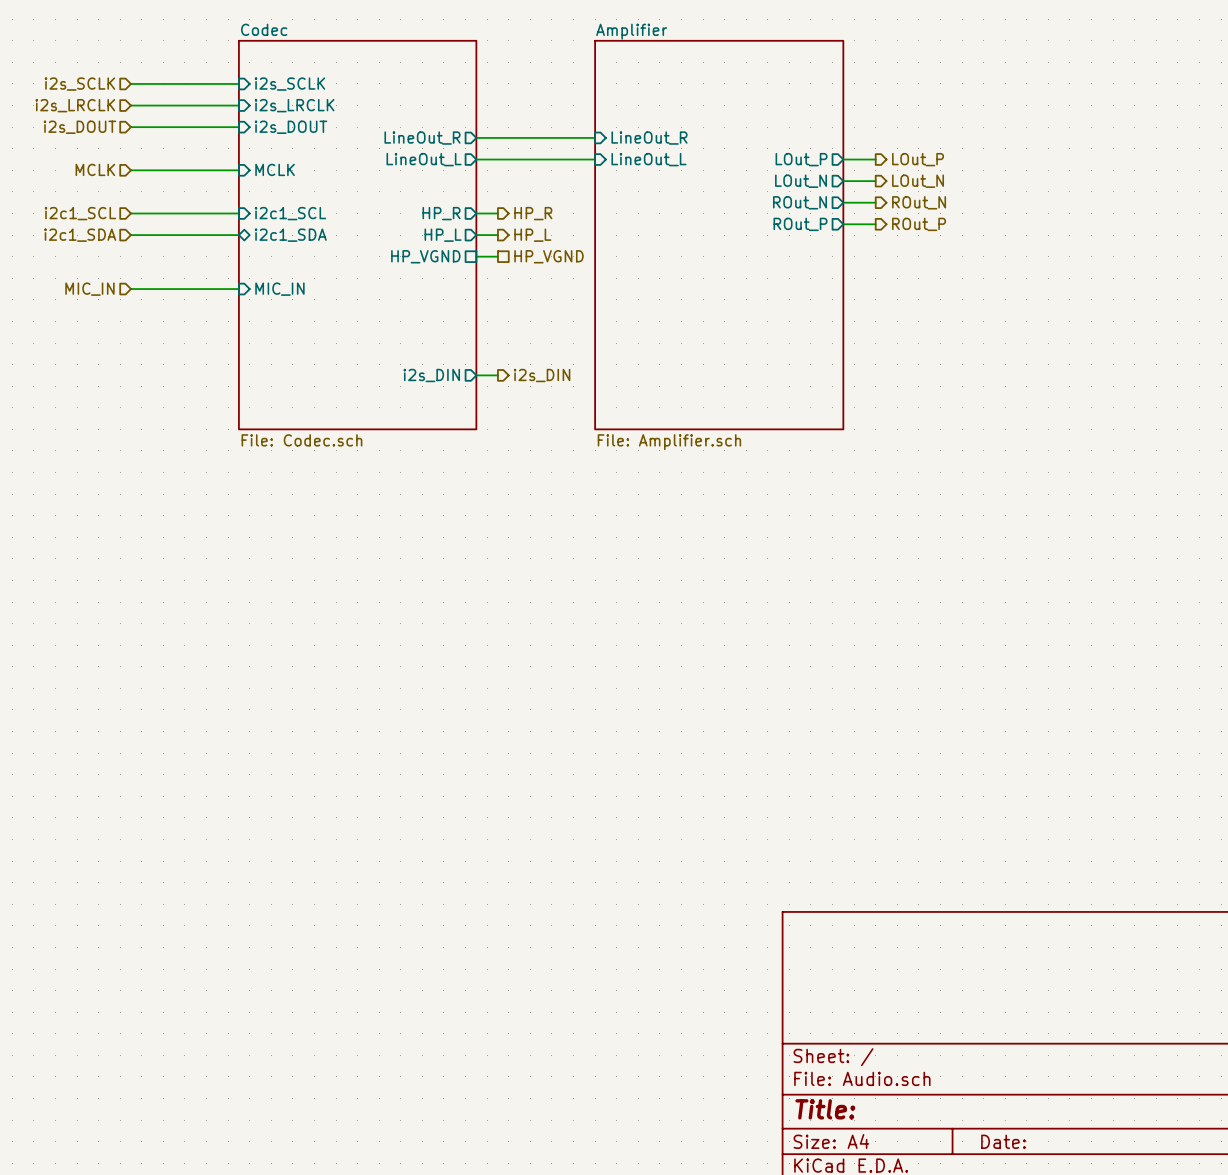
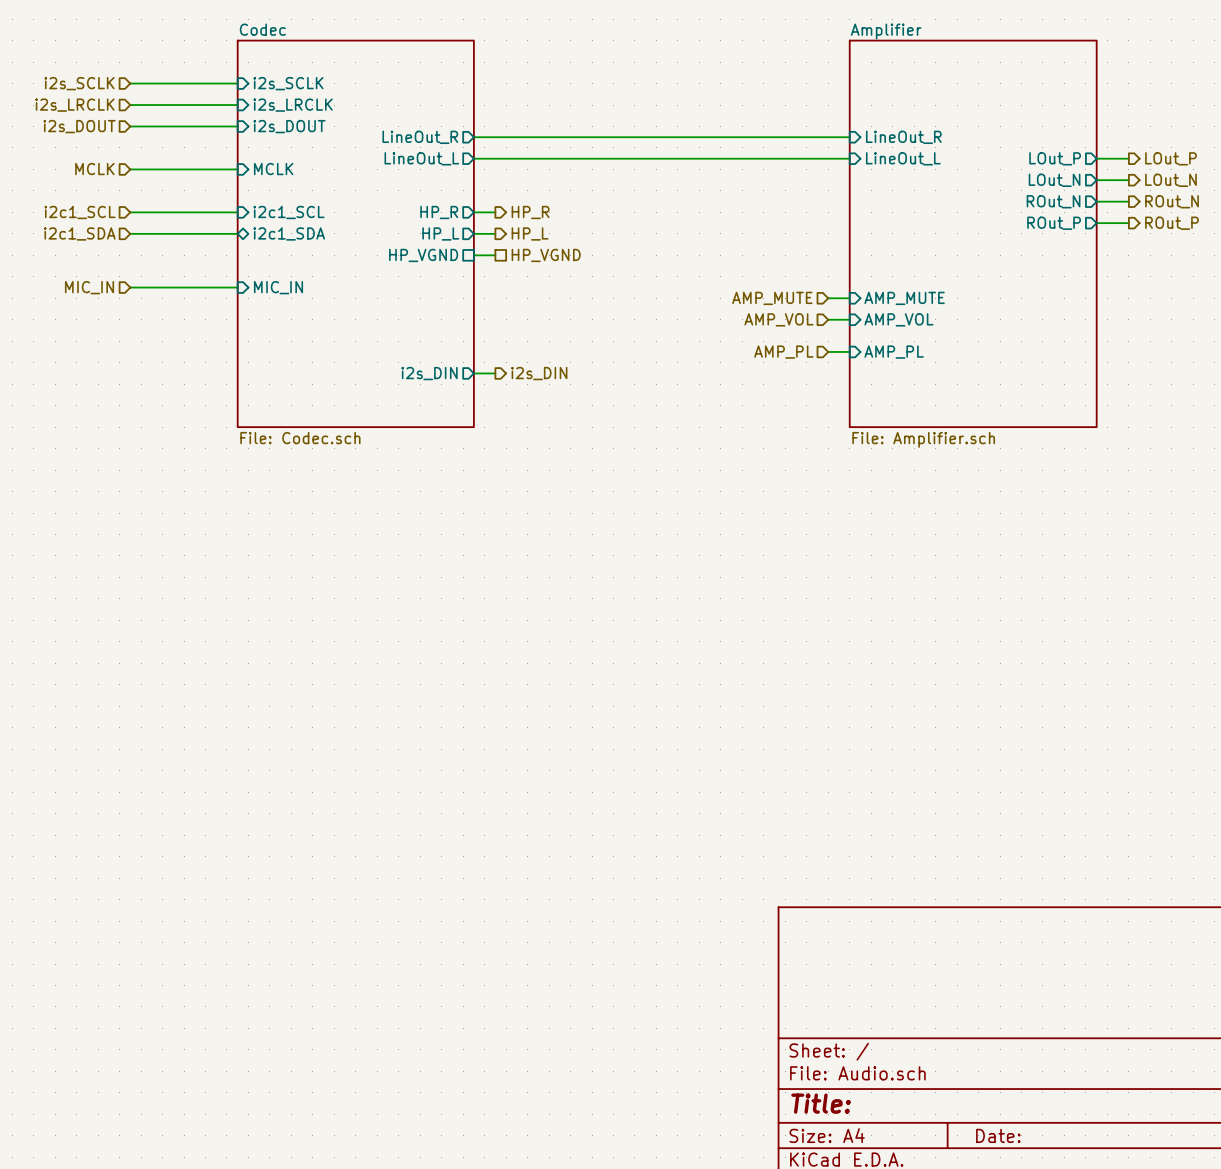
wire: none -> (592, 137) (849, 137)
sheet pin: LineOut_R (649, 138) -> none
sheet pin: none -> LineOut_R (903, 137)
wire: none -> (592, 158) (838, 158)
sheet pin: LineOut_L (648, 159) -> none
sheet pin: LOut_P (801, 159) -> none
wire: (854, 159) (875, 159) -> (828, 298) (849, 298)
sheet pin: none -> LineOut_L (903, 158)
hierarchical label: LOut_P (918, 159) -> none
sheet pin: none -> LOut_P (1055, 158)
wire: none -> (1096, 158) (1128, 158)
hierarchical label: none -> LOut_P (1170, 158)
sheet pin: LOut_N (801, 181) -> none
wire: (843, 181) (875, 181) -> none
hierarchical label: LOut_N (918, 181) -> none
sheet pin: none -> LOut_N (1054, 180)
wire: none -> (1096, 180) (1128, 180)
hierarchical label: none -> LOut_N (1170, 180)
sheet pin: ROut_N (799, 202) -> none
wire: (843, 202) (875, 202) -> none
hierarchical label: ROut_N (919, 202) -> none
sheet pin: none -> ROut_N (1053, 201)
wire: none -> (1096, 201) (1128, 201)
hierarchical label: none -> ROut_N (1172, 201)
sheet pin: ROut_P (800, 224) -> none
wire: (843, 224) (875, 224) -> none
hierarchical label: ROut_P (919, 224) -> none
sheet pin: none -> ROut_P (1054, 223)
wire: none -> (1096, 223) (1128, 223)
hierarchical label: none -> ROut_P (1172, 223)
sheet Amplifier: File: Amplifier.sch (719, 235) -> none
sheet Amplifier: none -> File: Amplifier.sch (973, 233)
hierarchical label: none -> AMP_MUTE (772, 298)
sheet pin: none -> AMP_MUTE (904, 298)
hierarchical label: none -> AMP_VOL (778, 319)
wire: none -> (828, 319) (849, 319)
sheet pin: none -> AMP_VOL (898, 319)
hierarchical label: none -> AMP_PL (783, 352)
wire: none -> (828, 351) (849, 351)
sheet pin: none -> AMP_PL (894, 352)

